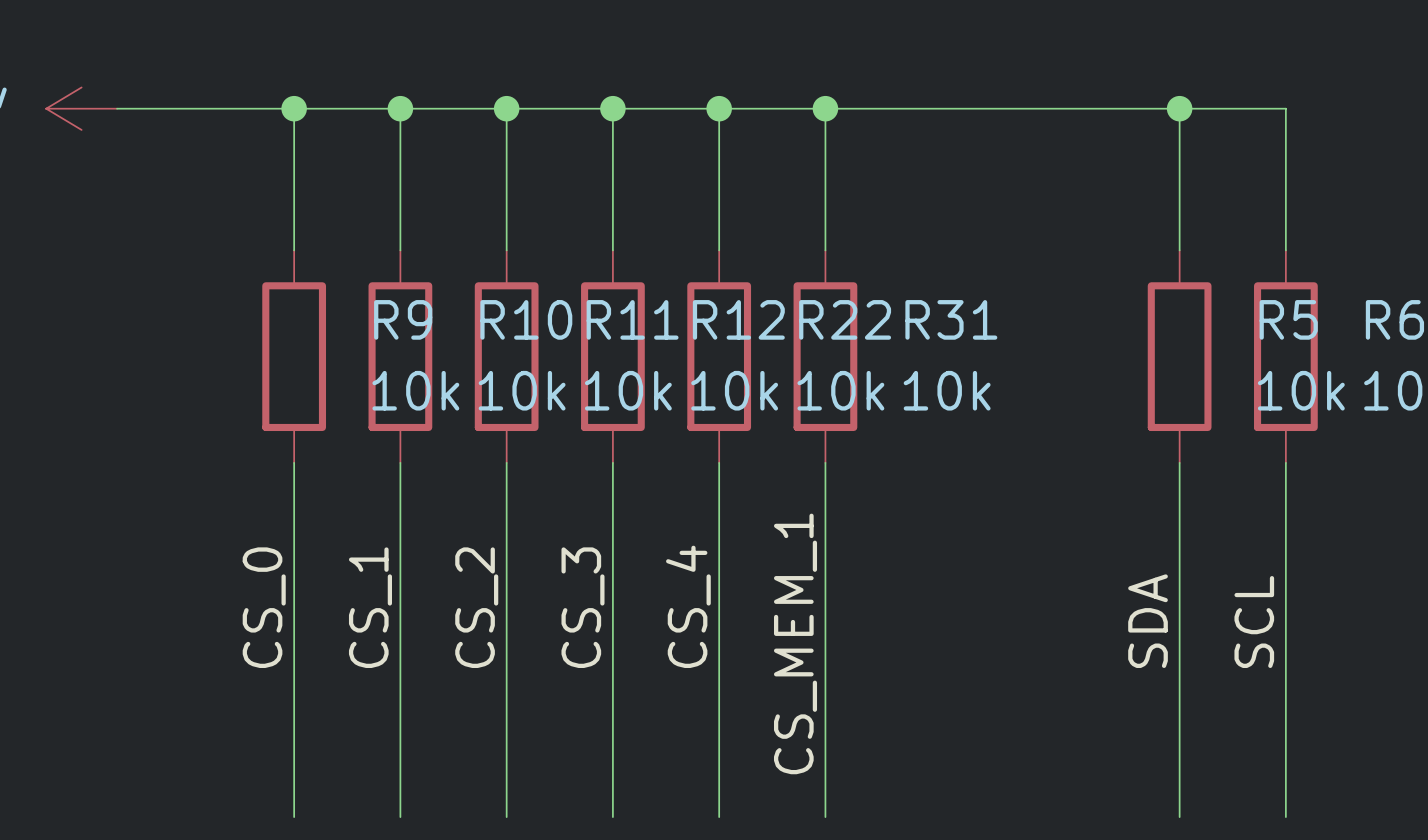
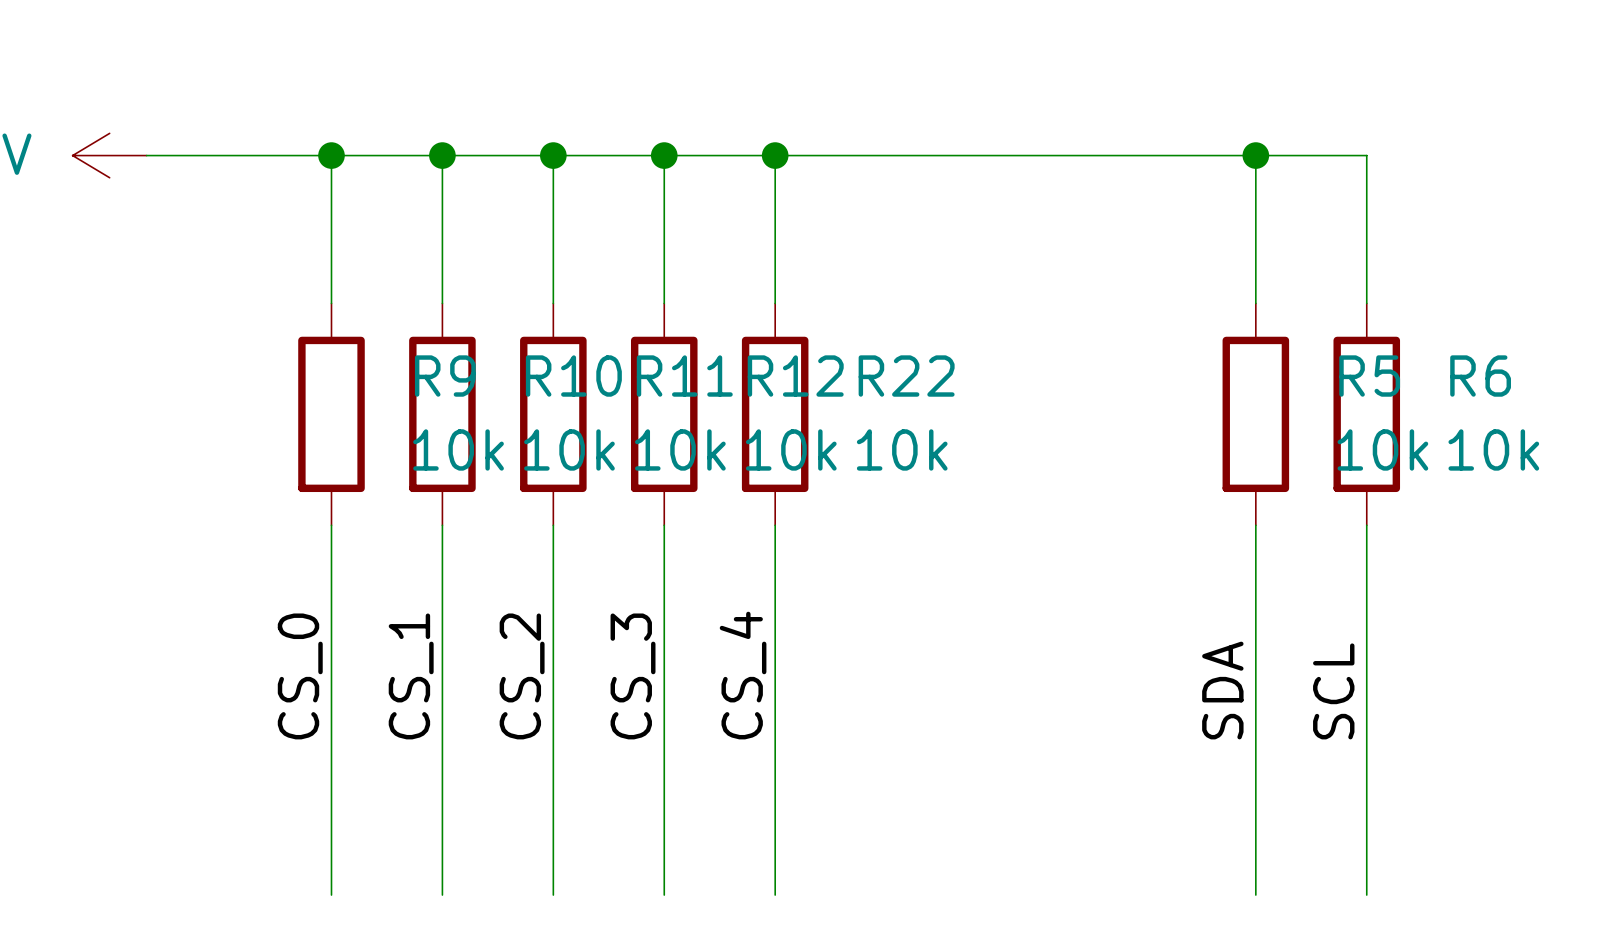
wire: (825, 108) (825, 250) -> none
junction: (825, 108) -> none
R31: 10k (825, 356) -> none
wire: (825, 462) (825, 817) -> none
label: CS_MEM_1 (795, 643) -> none

